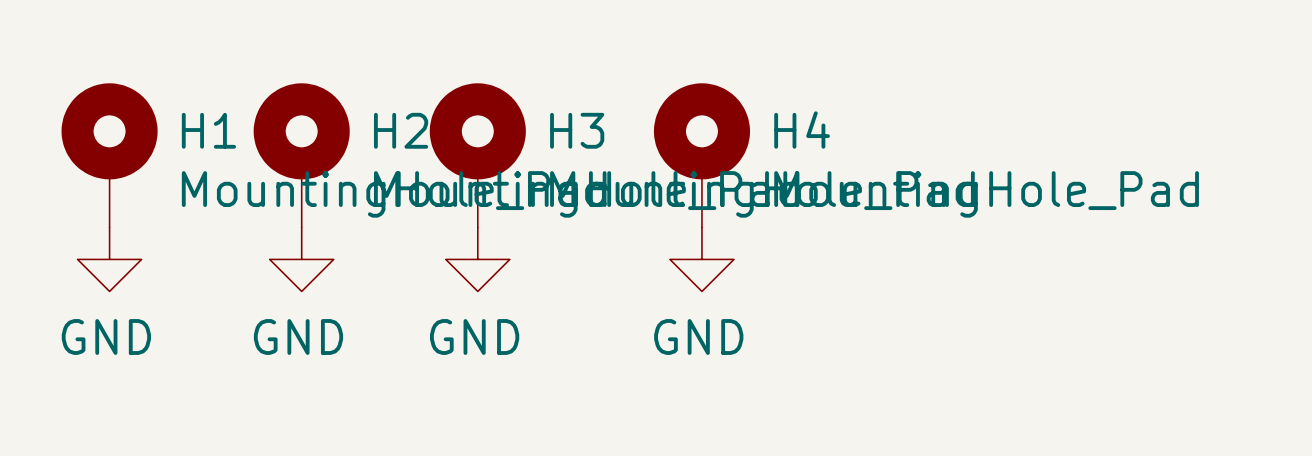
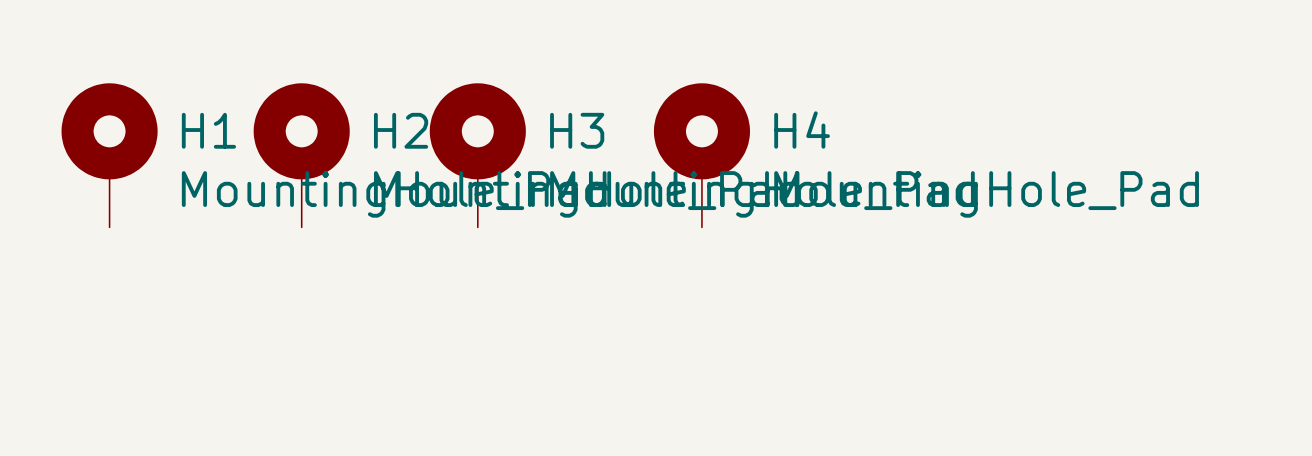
power symbol: GND (109, 259) -> none
power symbol: GND (301, 259) -> none
power symbol: GND (477, 259) -> none
power symbol: GND (701, 259) -> none

